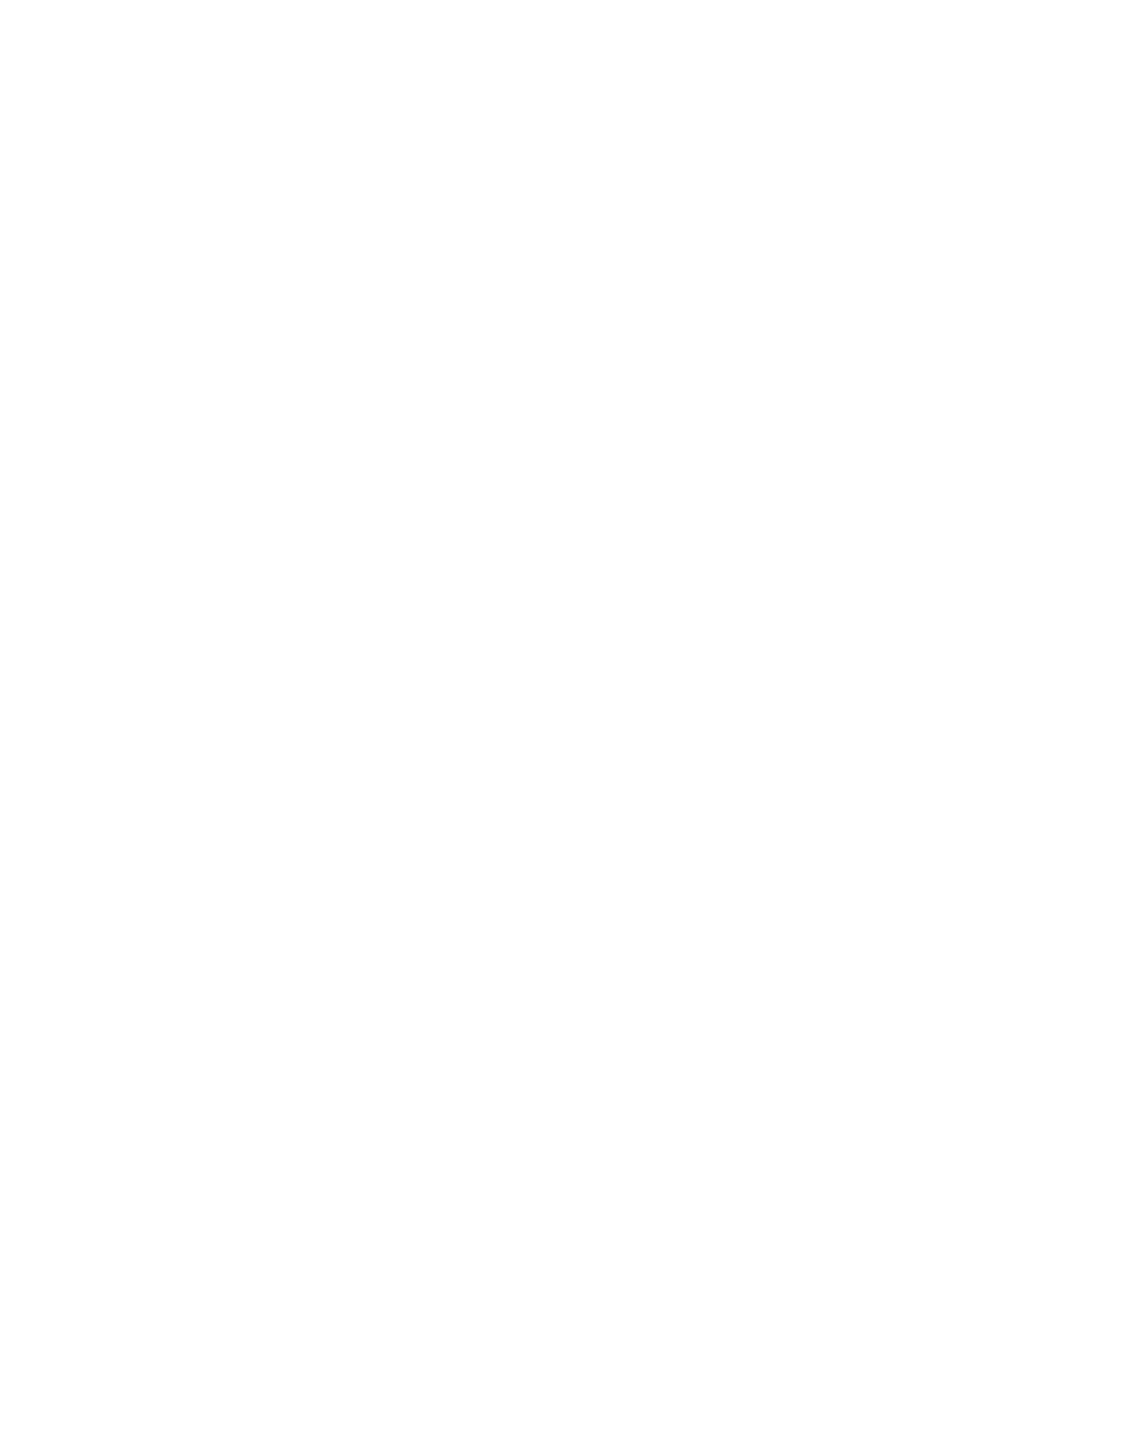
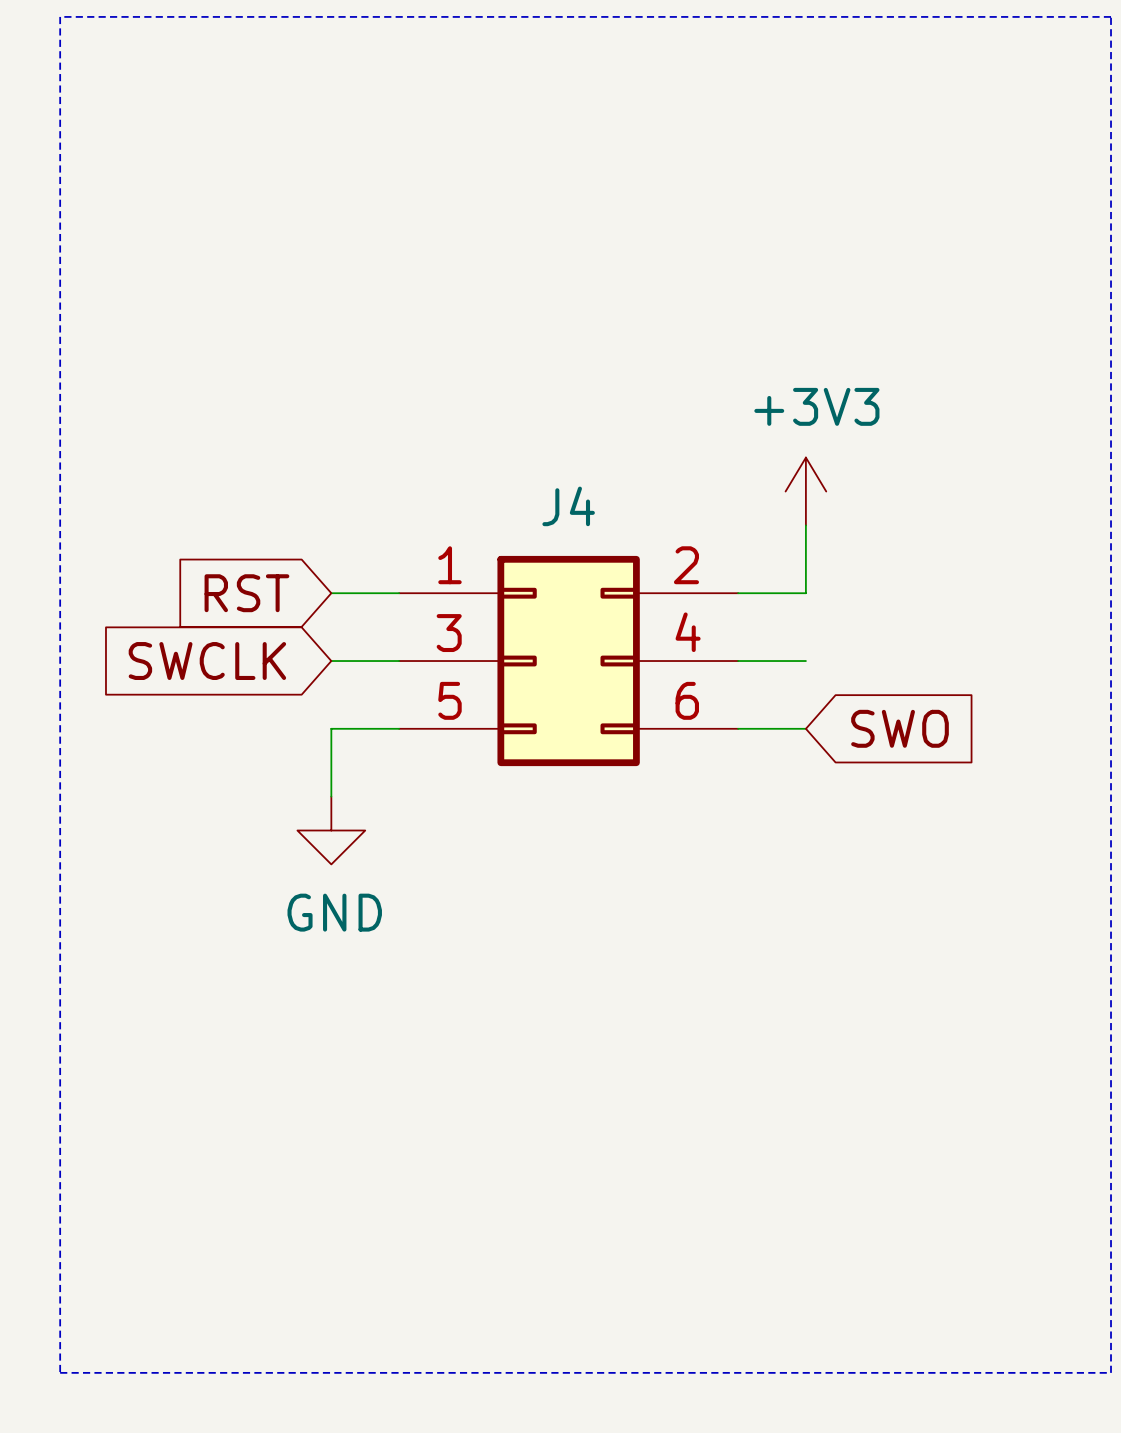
line: none -> (60, 16) (1111, 16) (1111, 1372) (60, 1372) (60, 16)
power symbol: none -> +3V3 (805, 491)
wire: none -> (805, 525) (805, 593) (738, 593)
global label: none -> RST (246, 593)
wire: none -> (331, 593) (399, 593)
global label: none -> SWCLK (207, 661)
wire: none -> (331, 661) (399, 661)
J4: none -> (568, 661)
wire: none -> (738, 661) (805, 661)
wire: none -> (399, 728) (331, 728) (331, 796)
wire: none -> (738, 728) (805, 728)
global label: none -> SWO (900, 728)
power symbol: none -> GND (331, 830)

